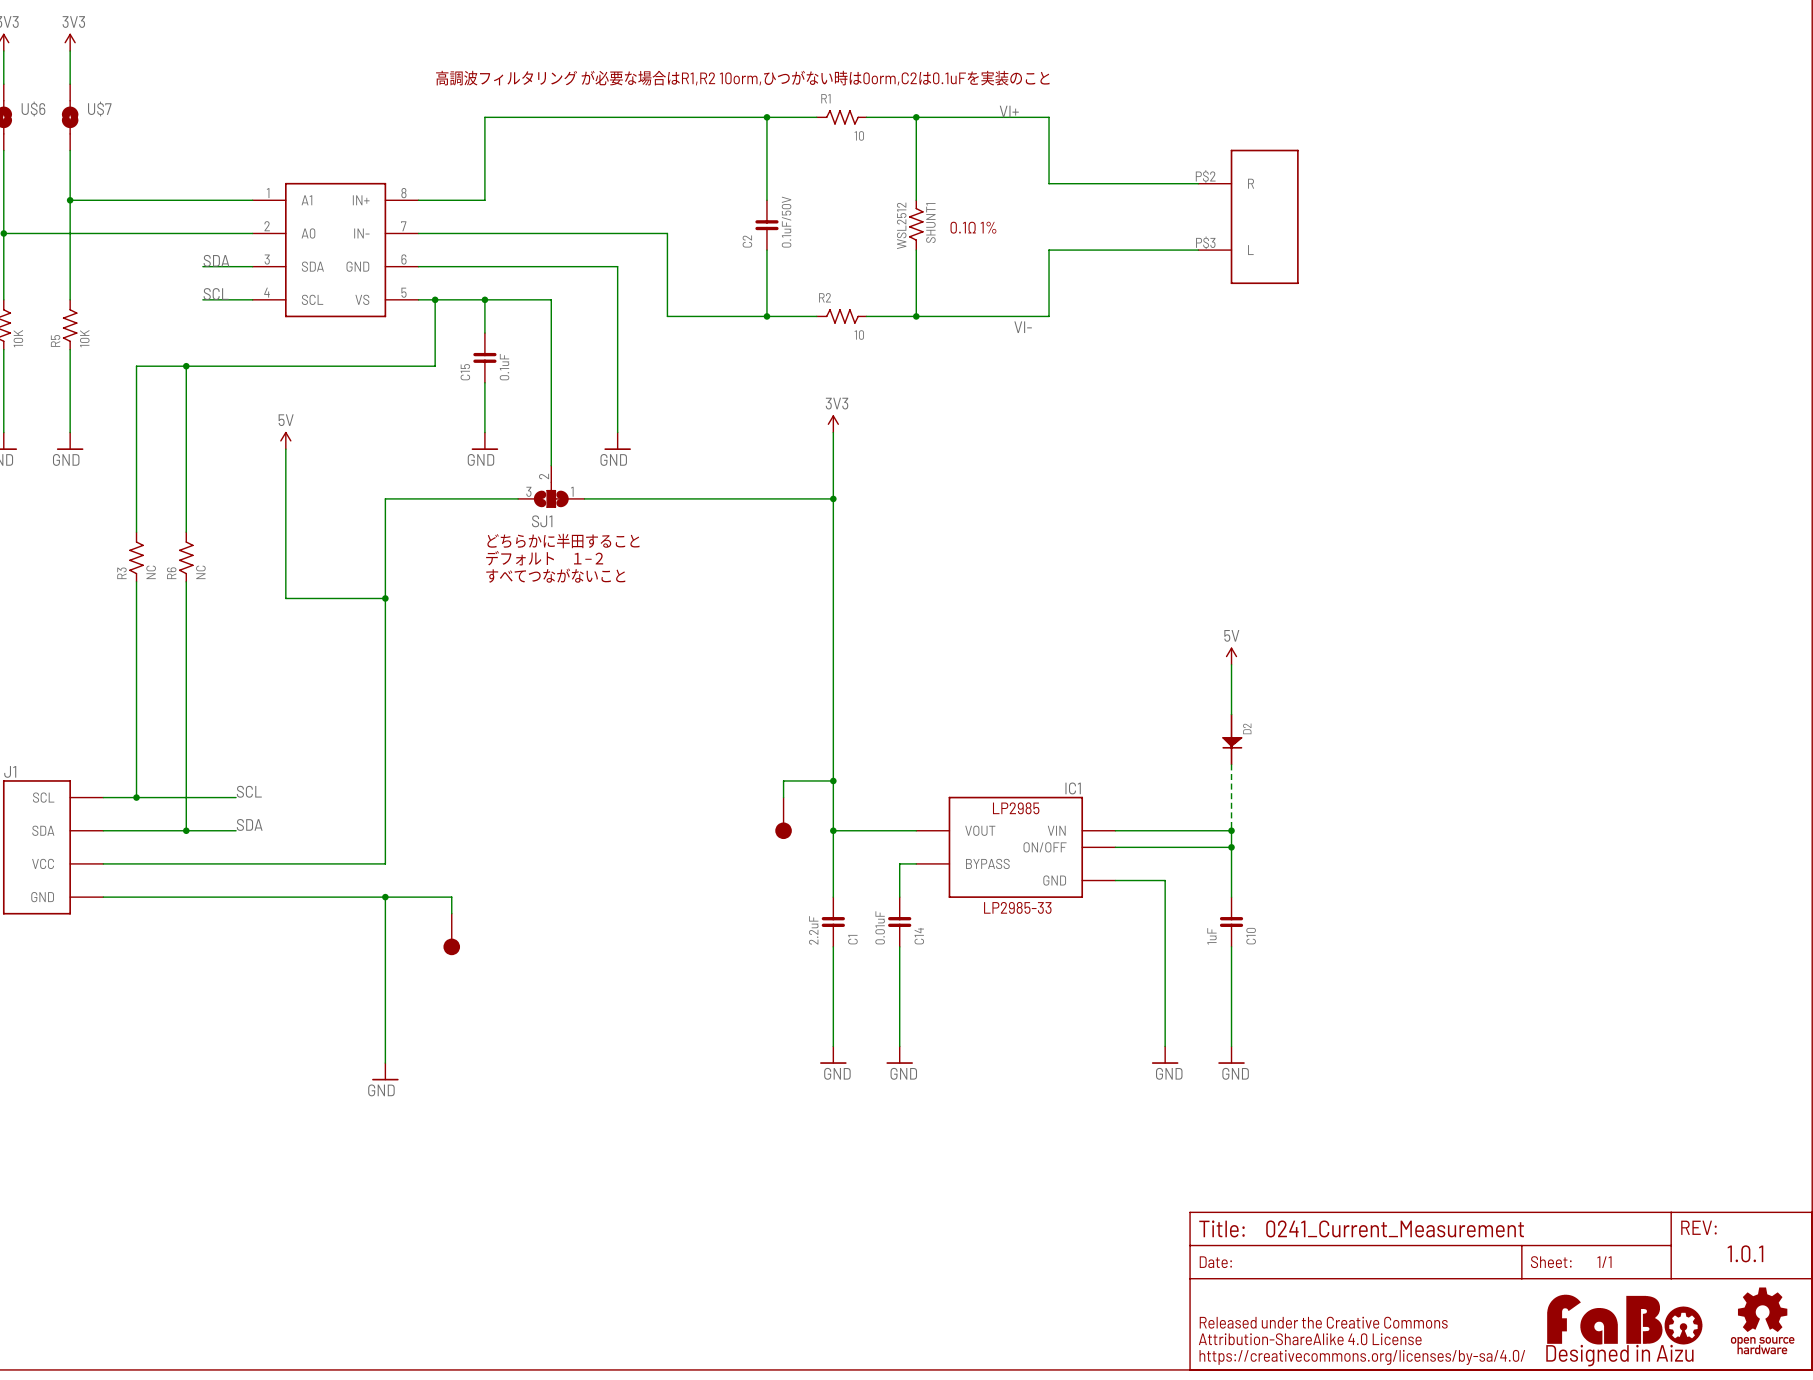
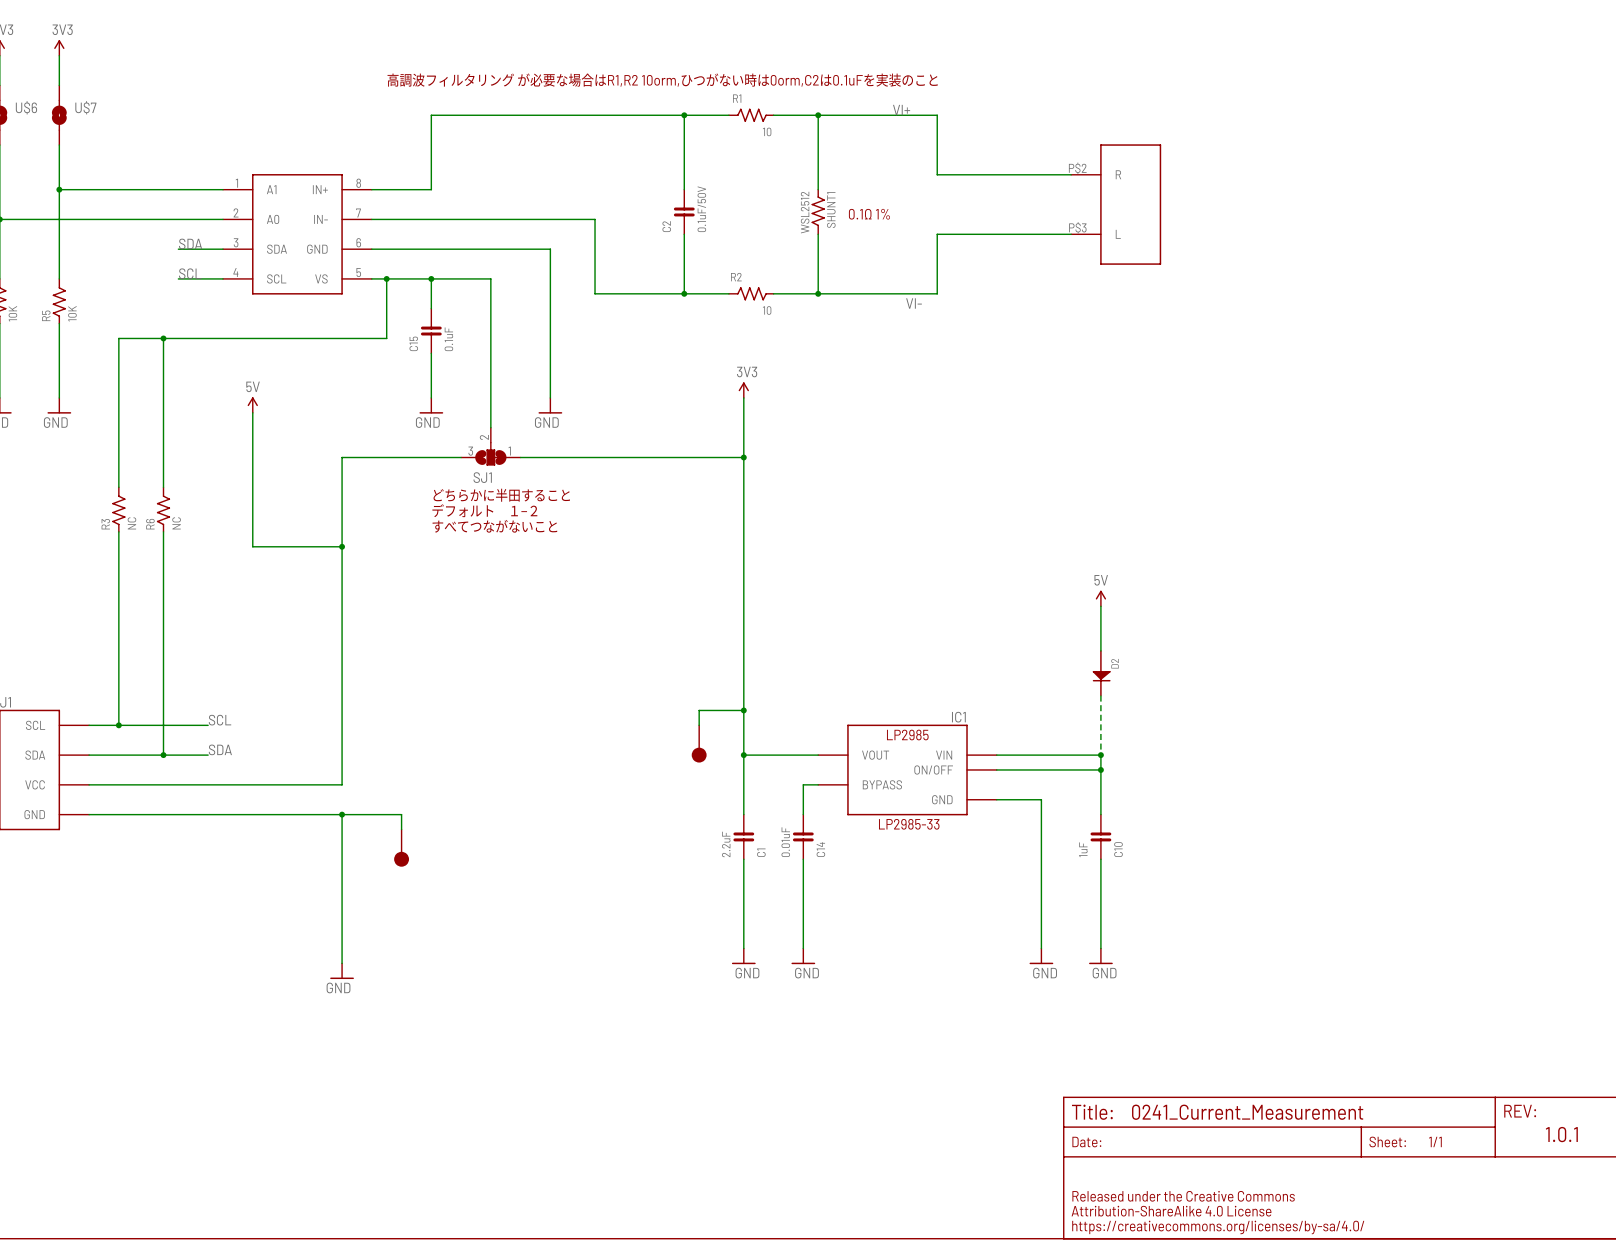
part: (1624, 1319) -> none
part: (1762, 1320) -> none

